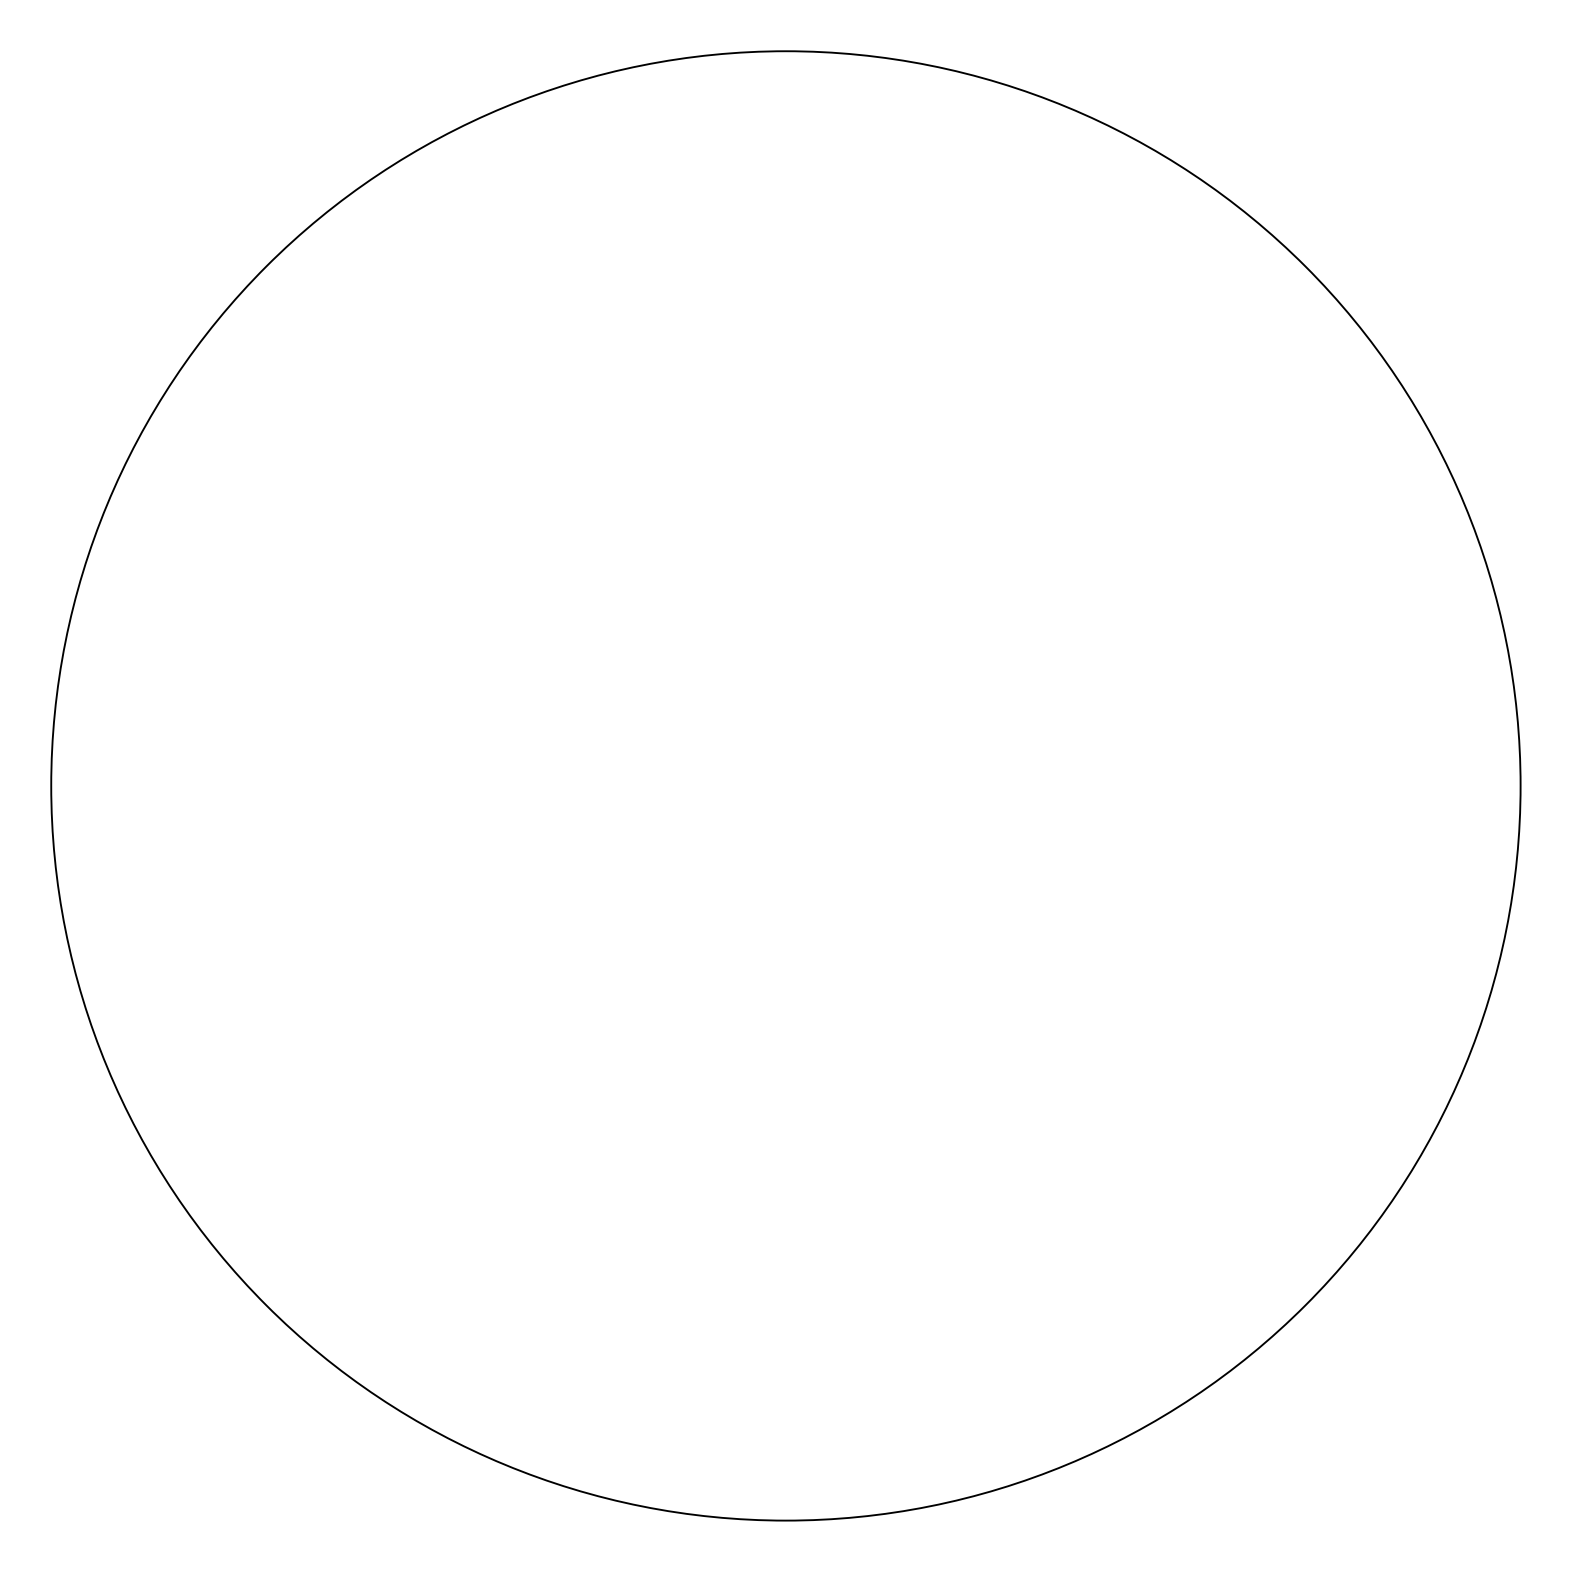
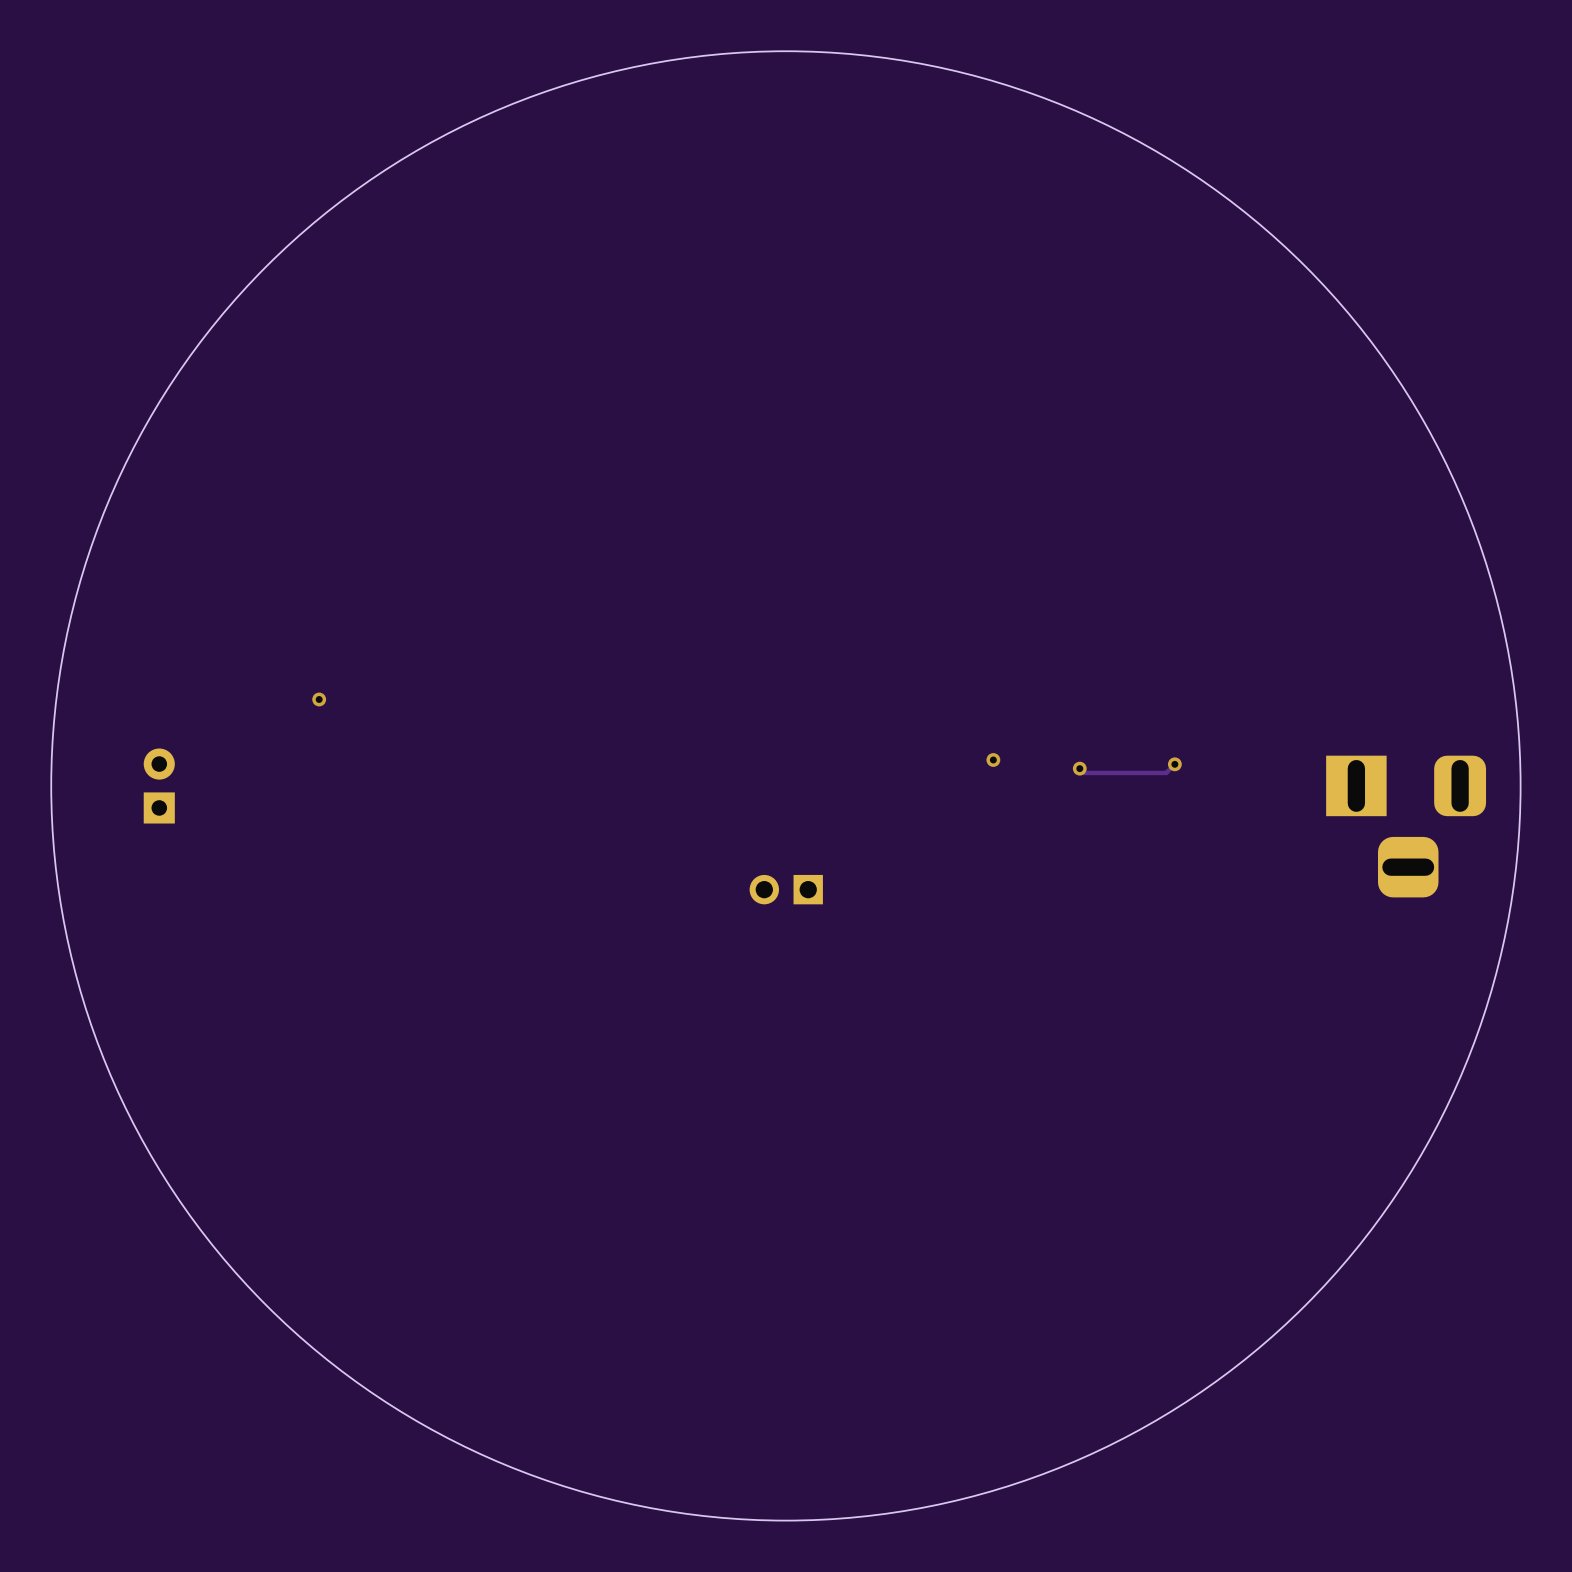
via: none -> (319, 699)
via: none -> (993, 759)
track: none -> (1174, 764) (1166, 772) (1084, 772) (1079, 768)
via: none -> (1174, 764)
via: none -> (1079, 768)
part: none -> (159, 786)
part: none -> (1406, 826)
part: none -> (786, 889)

